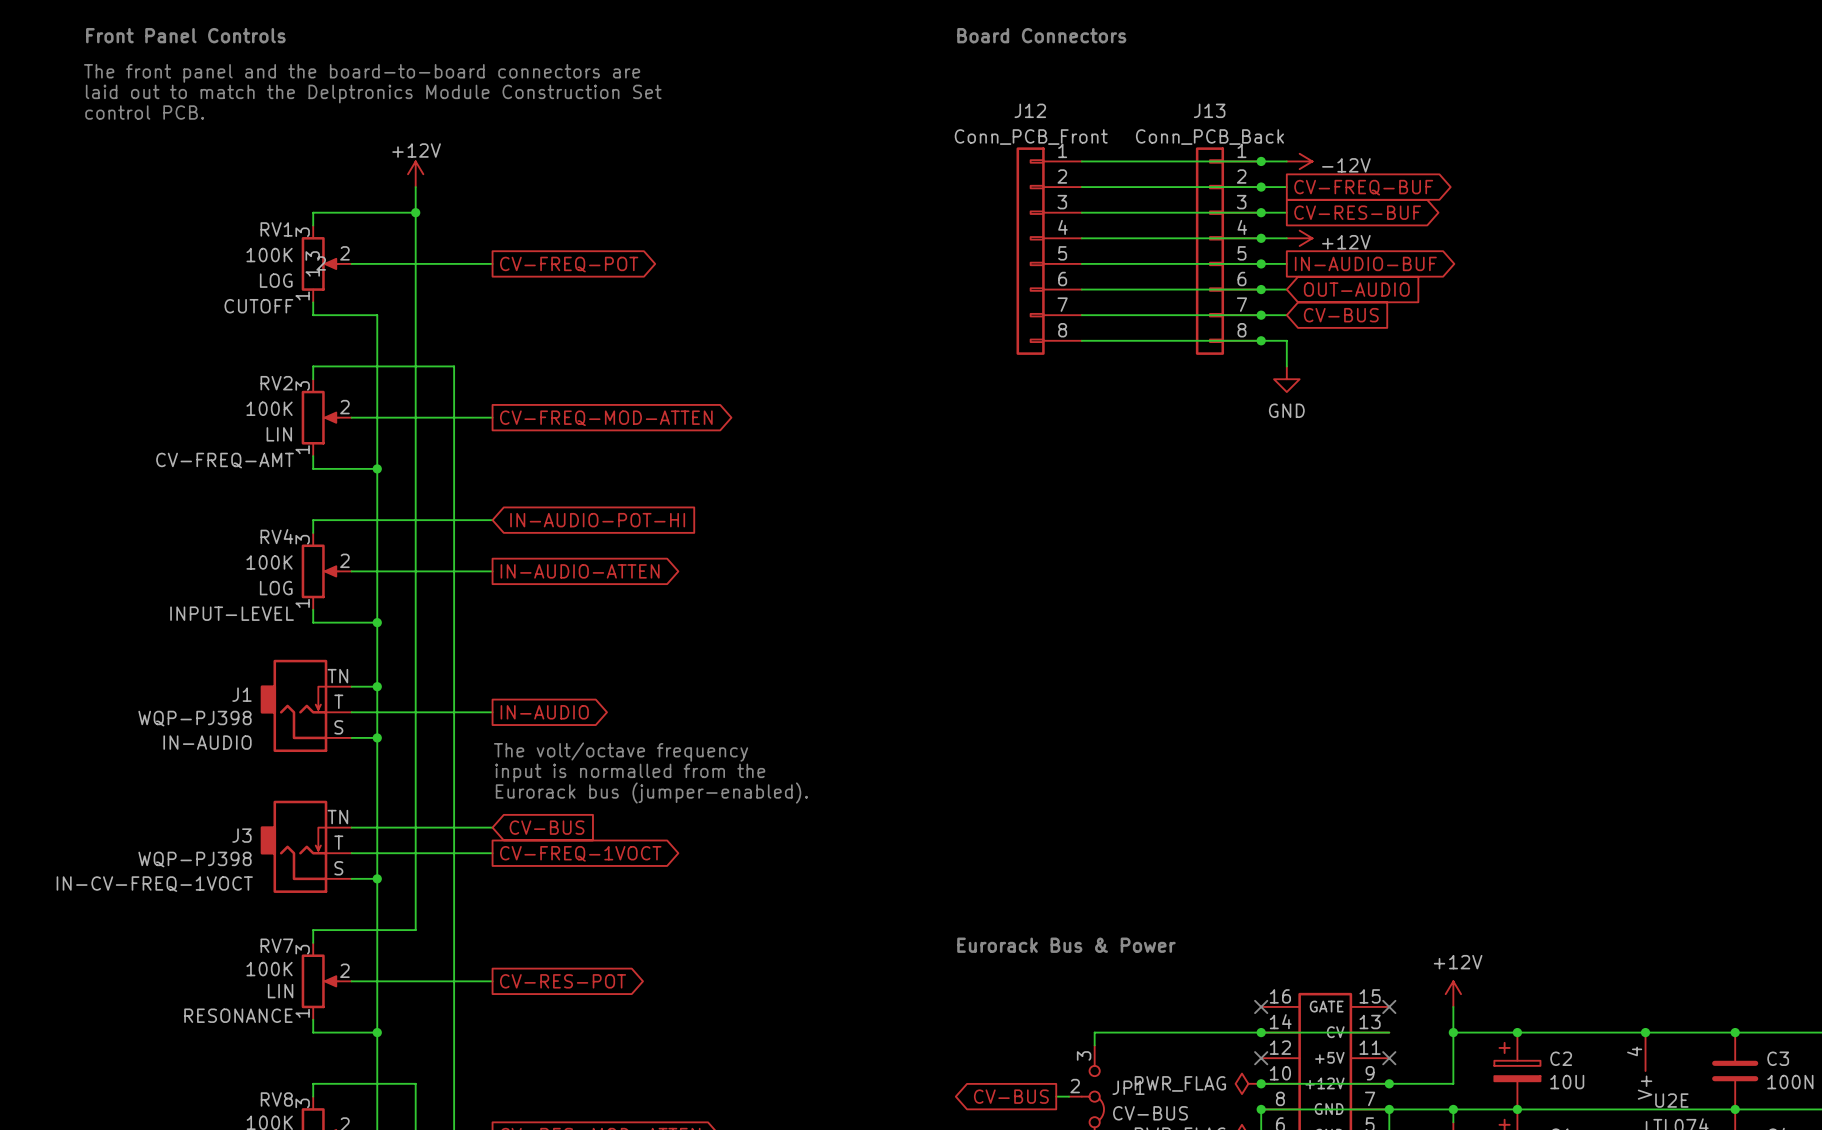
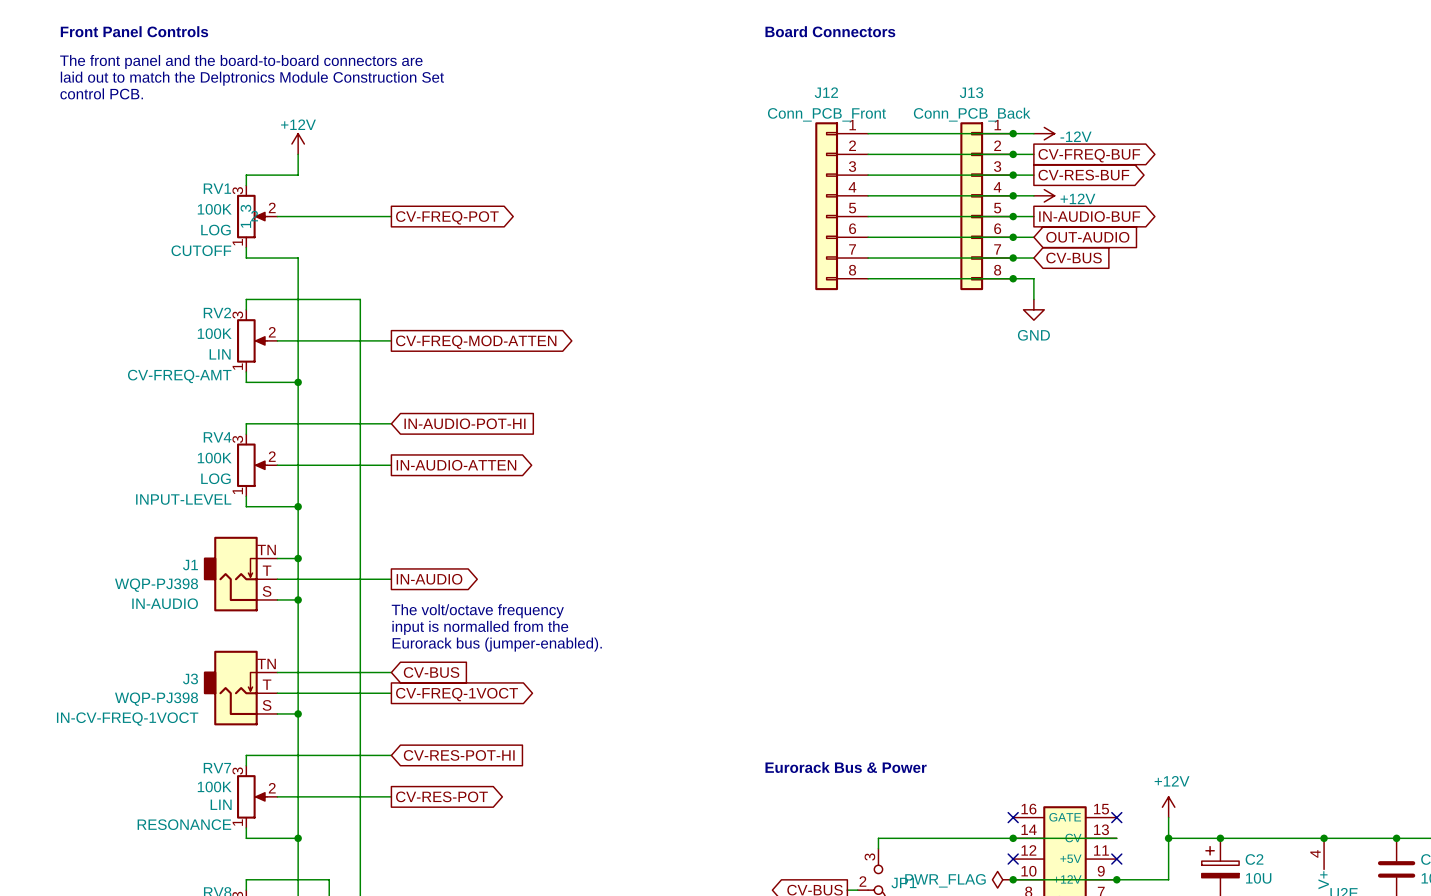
power symbol position: +12V (415, 174) -> +12V (298, 144)
wire: (415, 187) (415, 930) -> (391, 755) (329, 755)
wire: (377, 212) (415, 212) -> (298, 175) (298, 154)
junction: (415, 212) -> none
global label: none -> CV-RES-POT-HI (459, 755)

